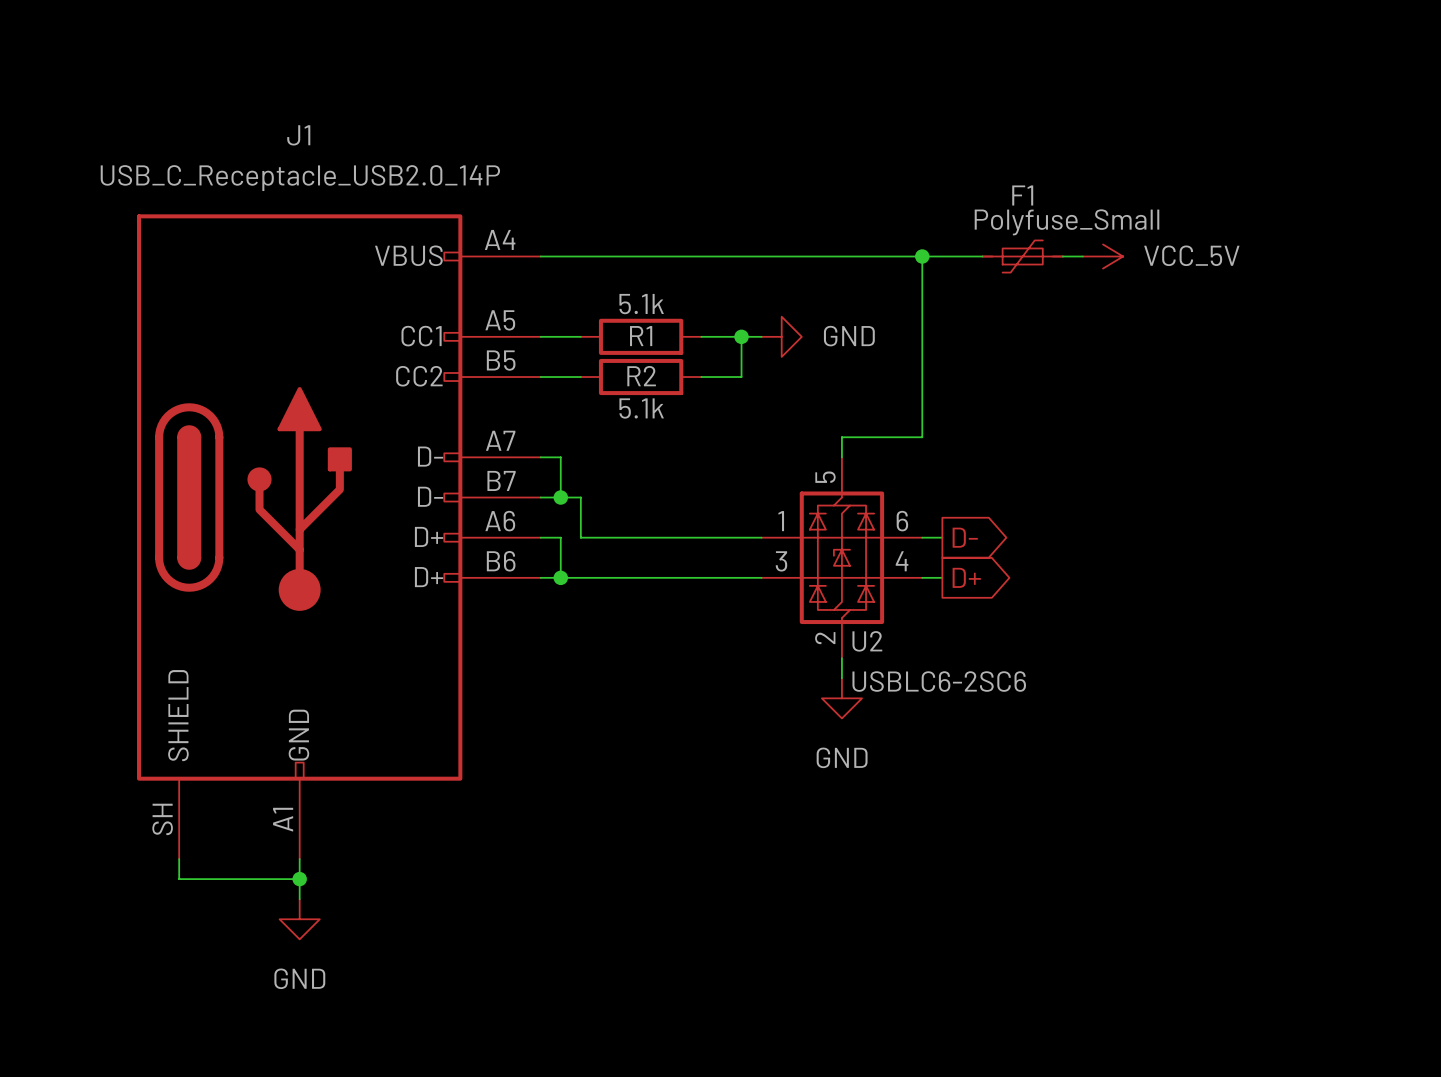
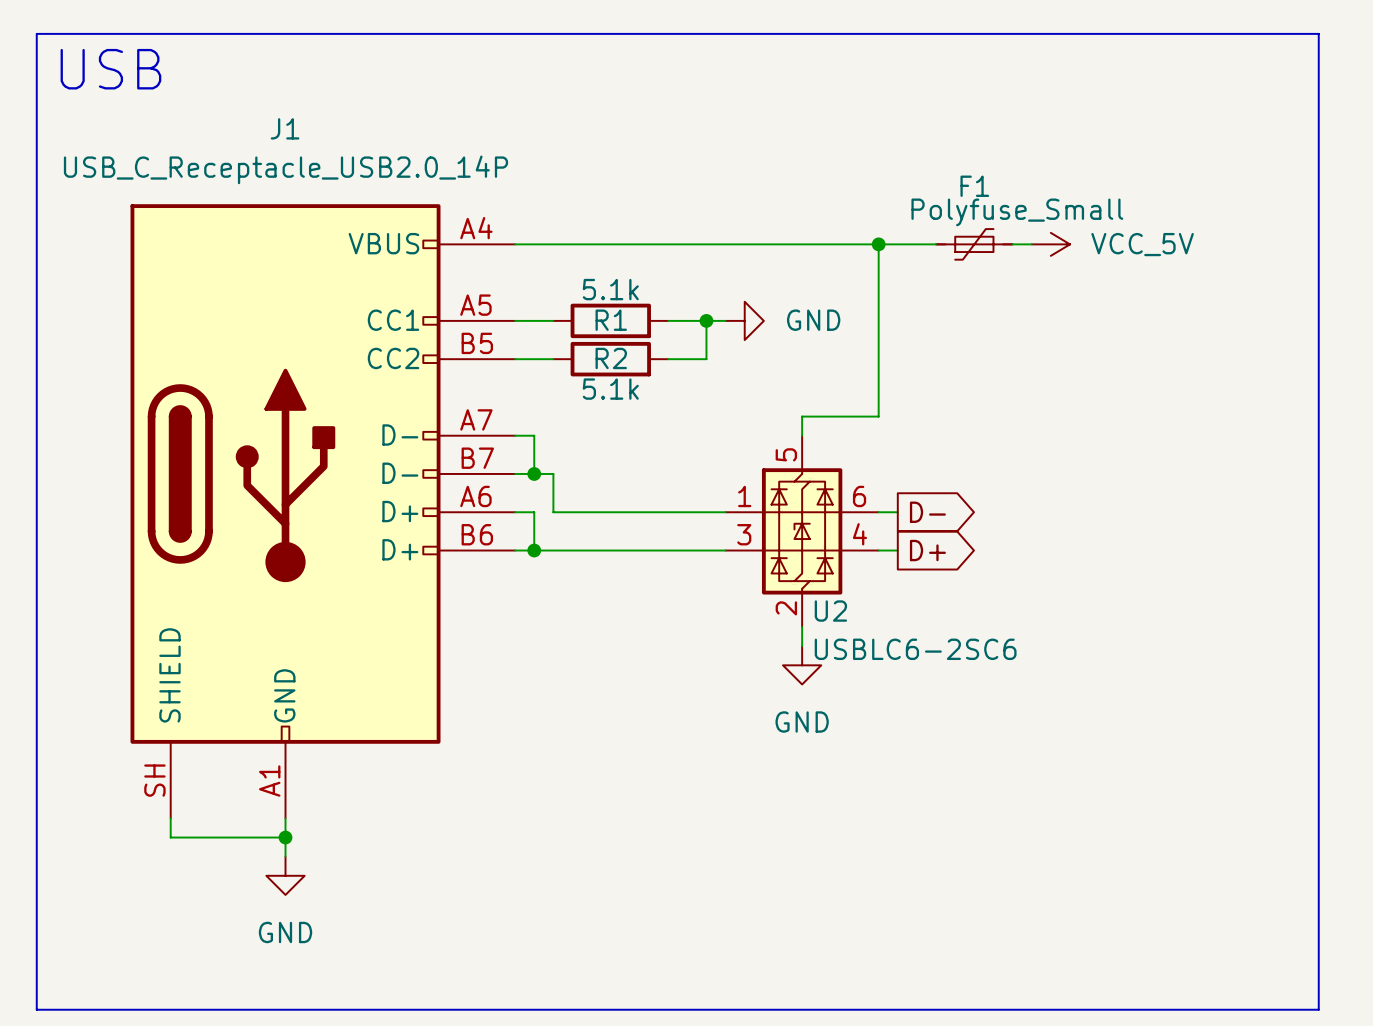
line: none -> (36, 33) (1318, 33) (1318, 1009) (36, 1009) (36, 33)
text: none -> USB (110, 69)

